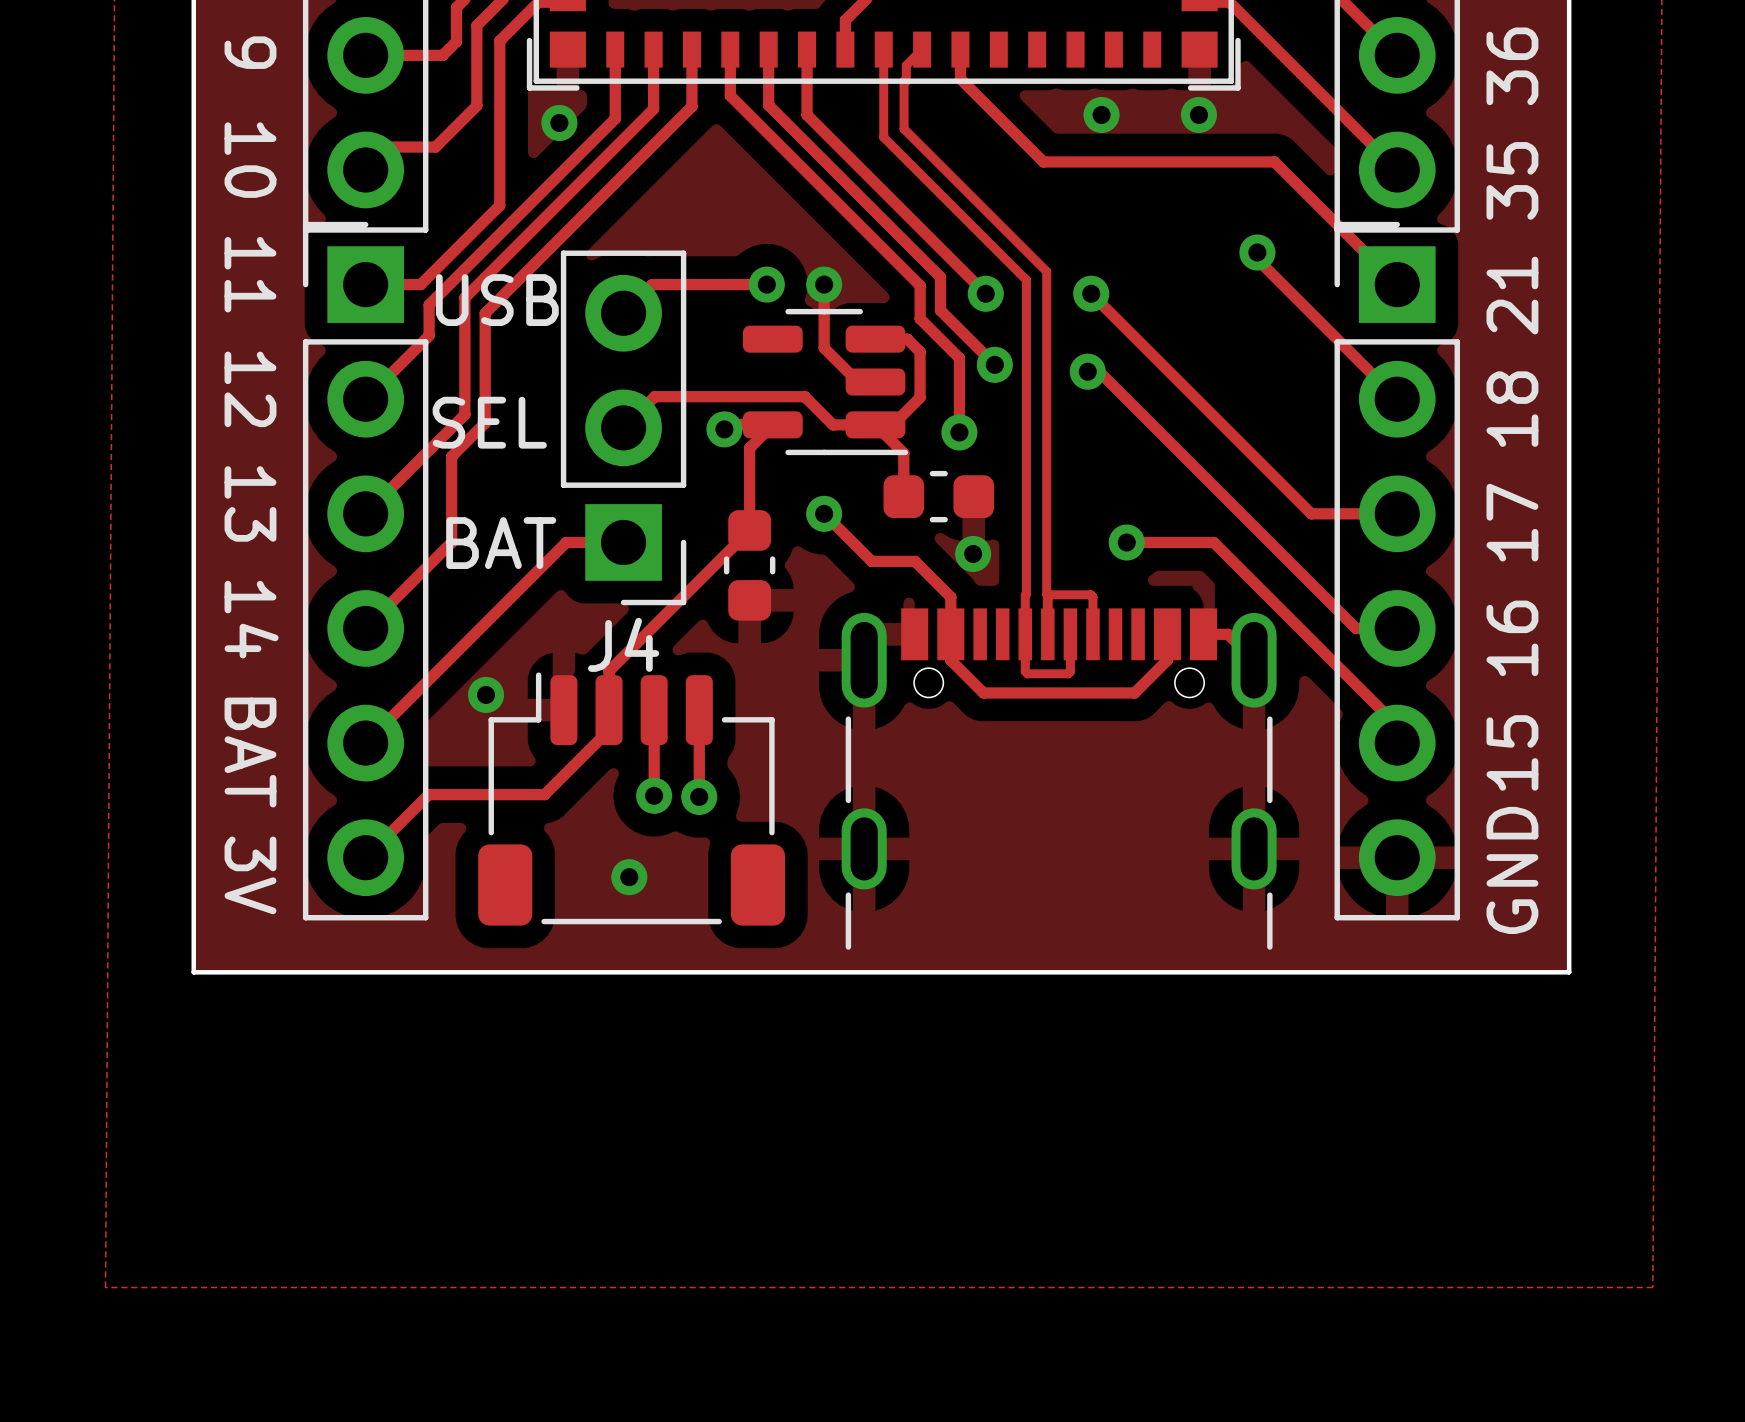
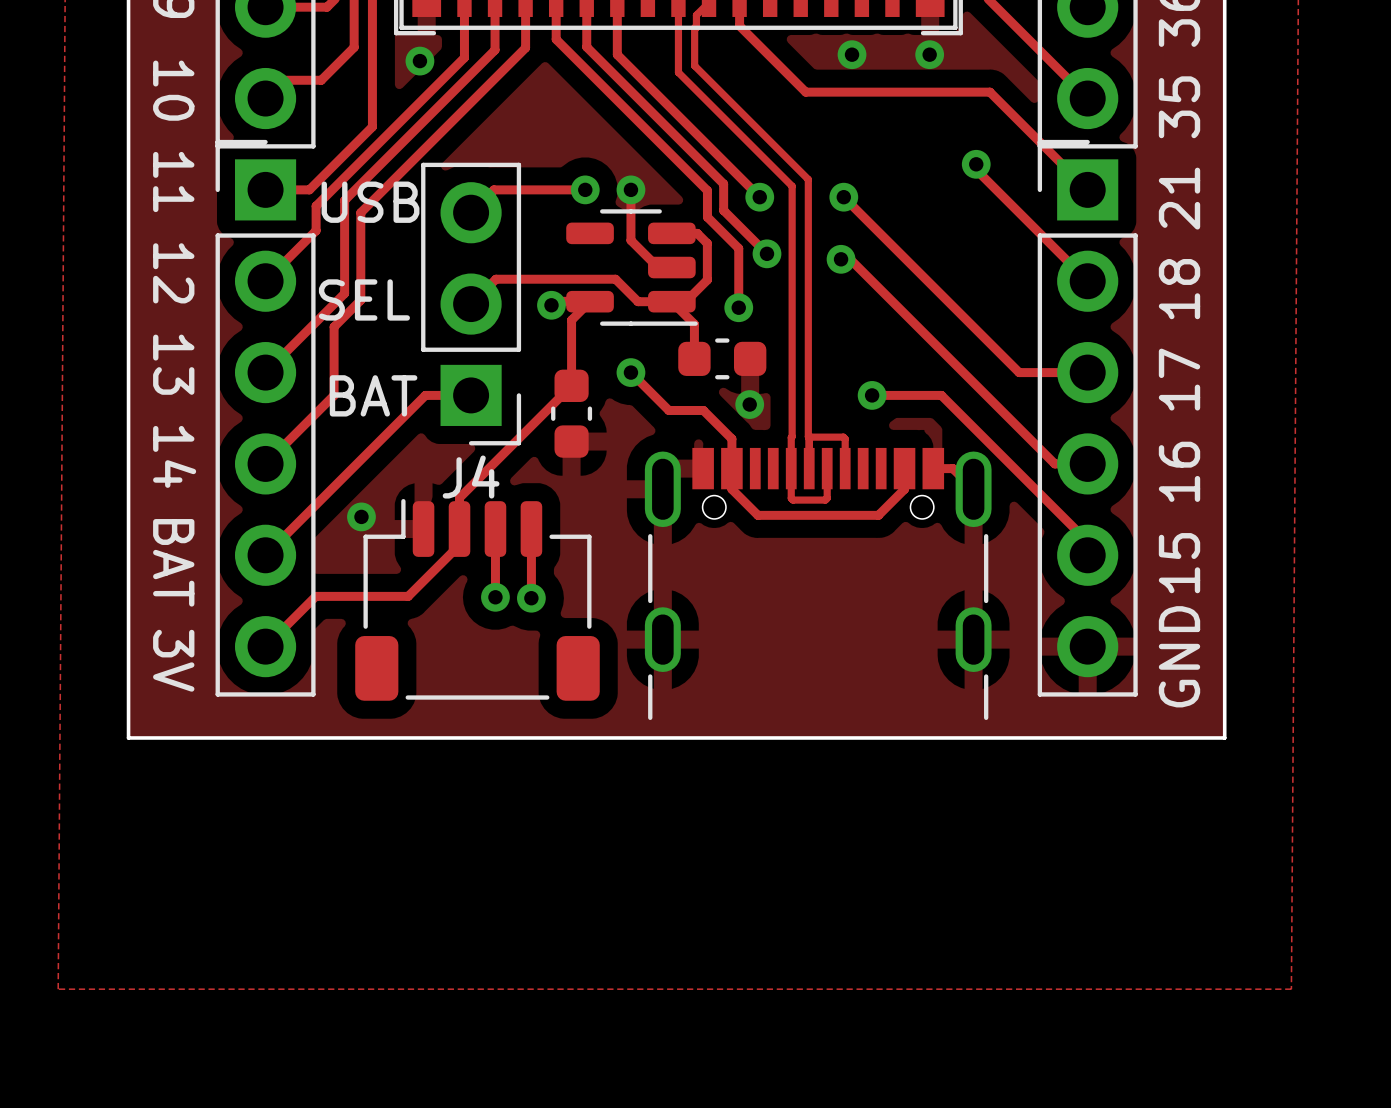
via: (629, 877) -> none

